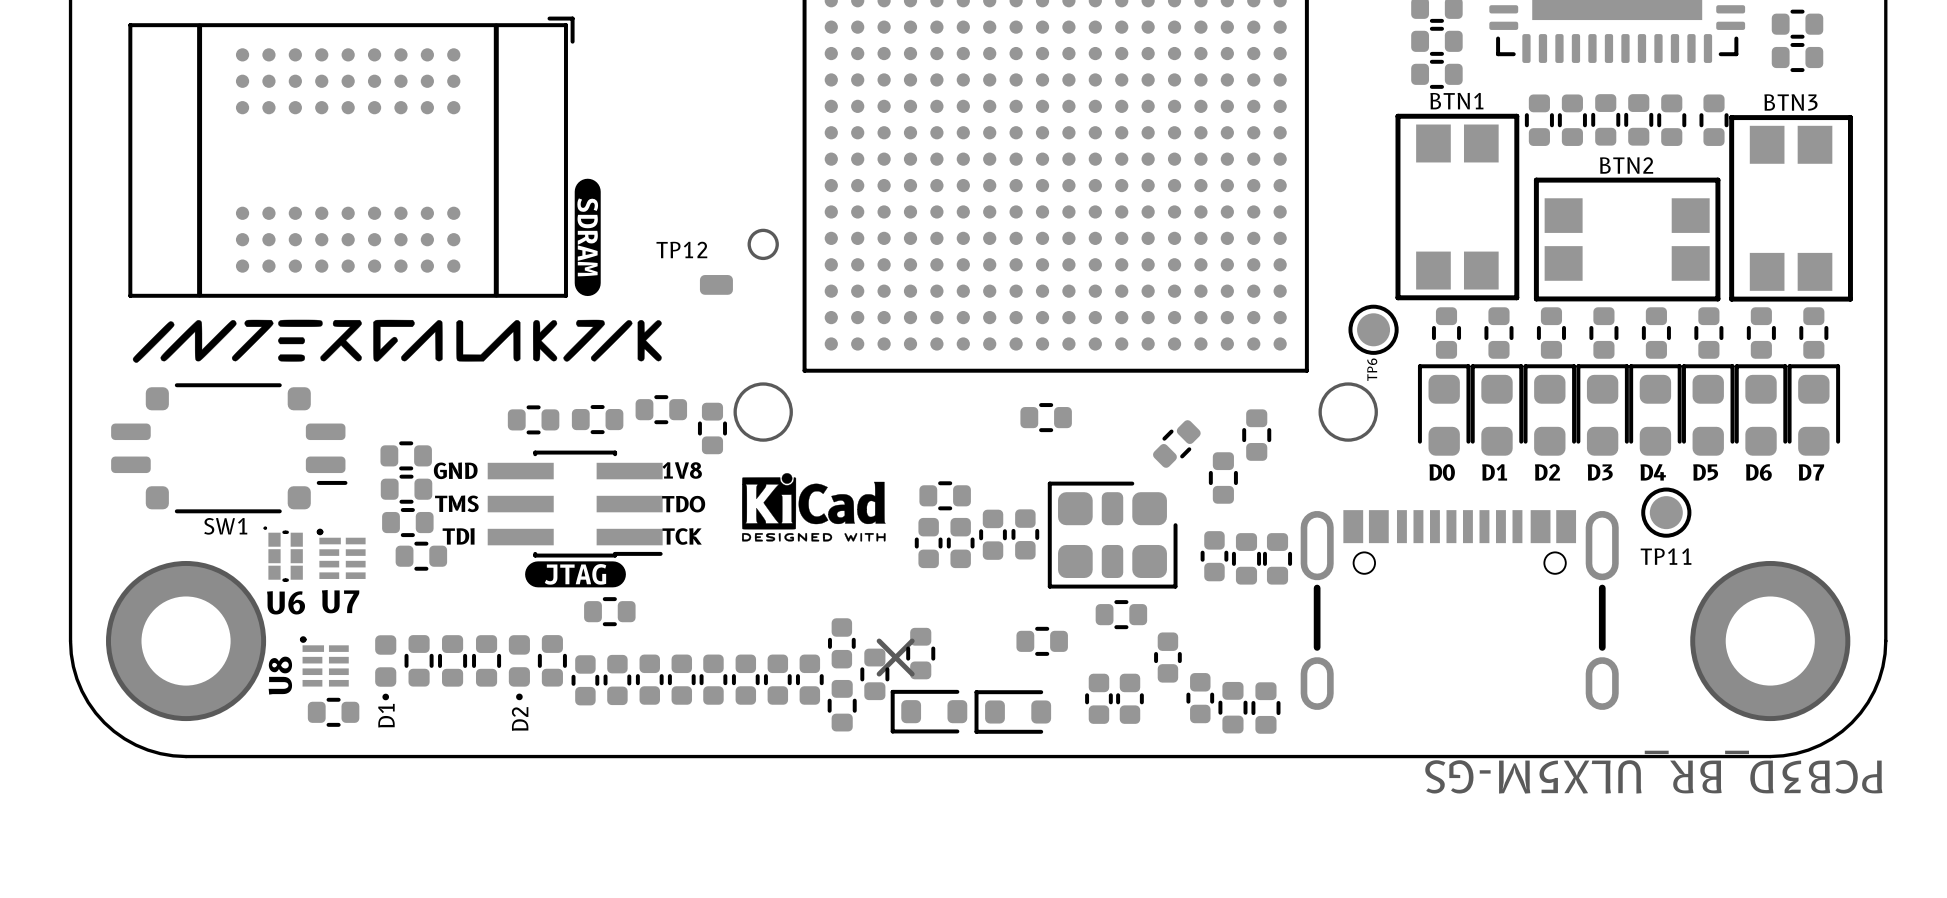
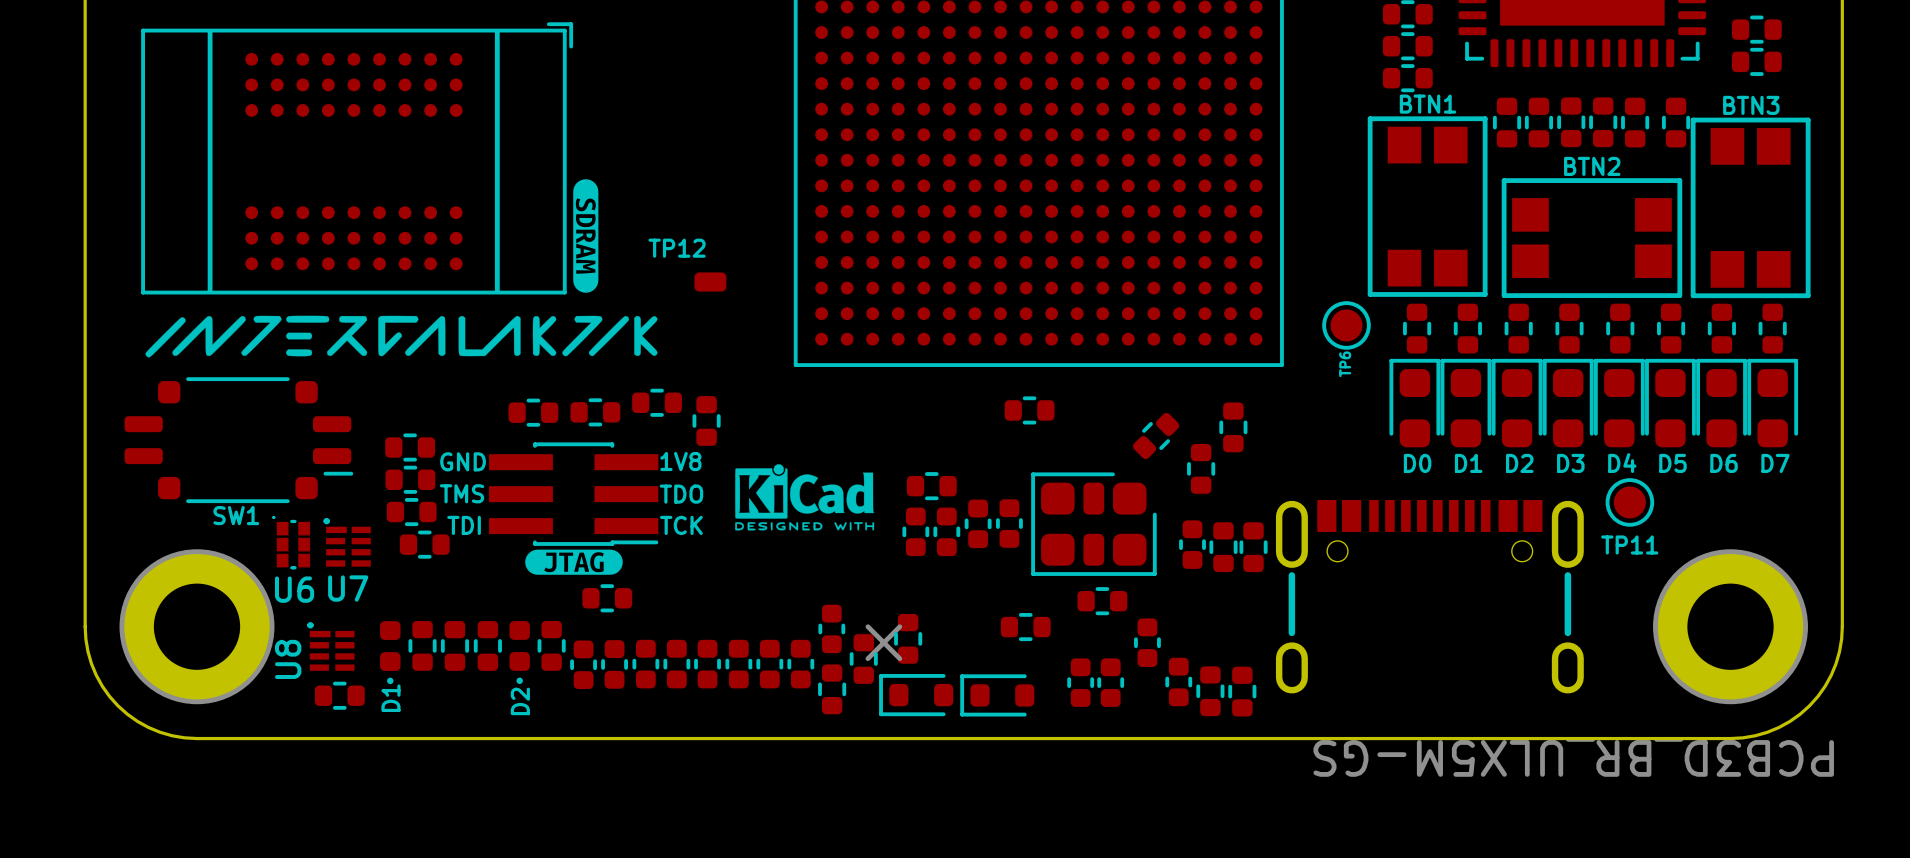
drawing: [747, 228, 779, 261] -> none
drawing: [733, 382, 793, 442] -> none
drawing: [1318, 382, 1378, 442] -> none

